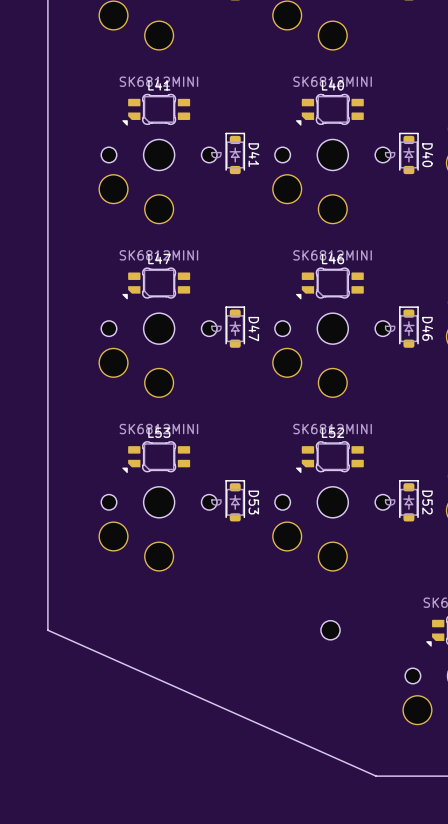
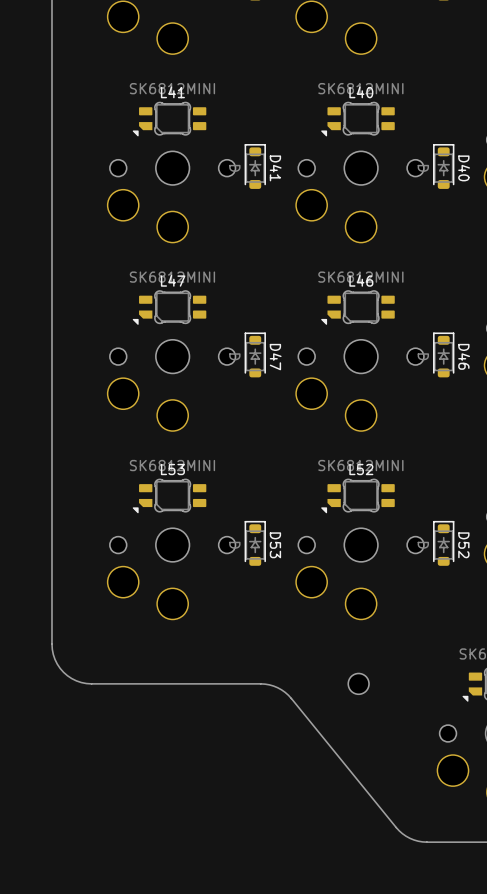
board edge: (47, 593) (47, 630) (376, 776) (393, 776) -> (51, 644) (55, 659) (63, 672) (71, 678) (86, 683) (260, 683) (277, 687) (291, 698) (399, 830) (409, 838) (426, 842)

